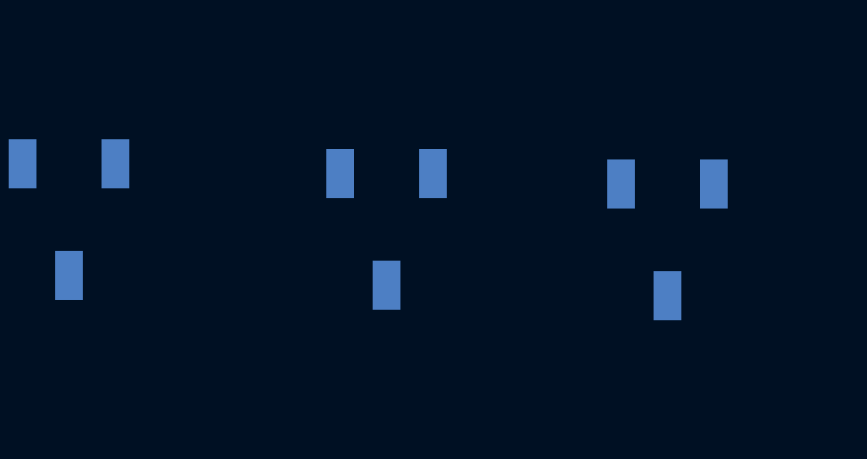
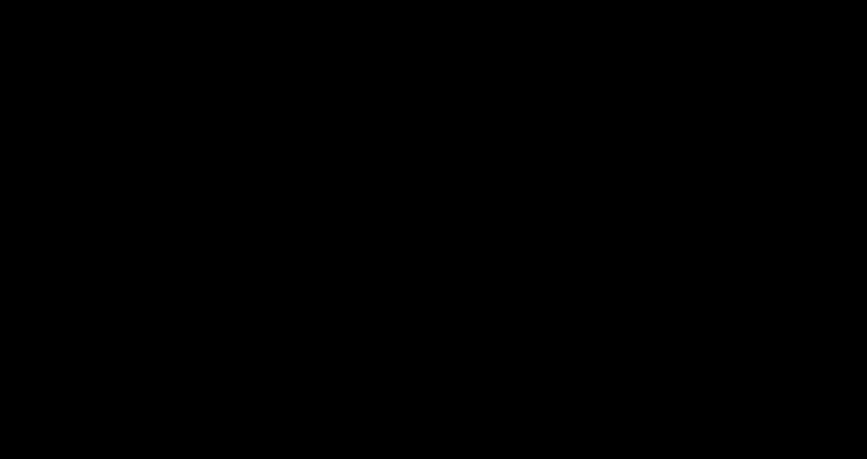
part: (68, 219) -> none
part: (386, 229) -> none
part: (667, 239) -> none

